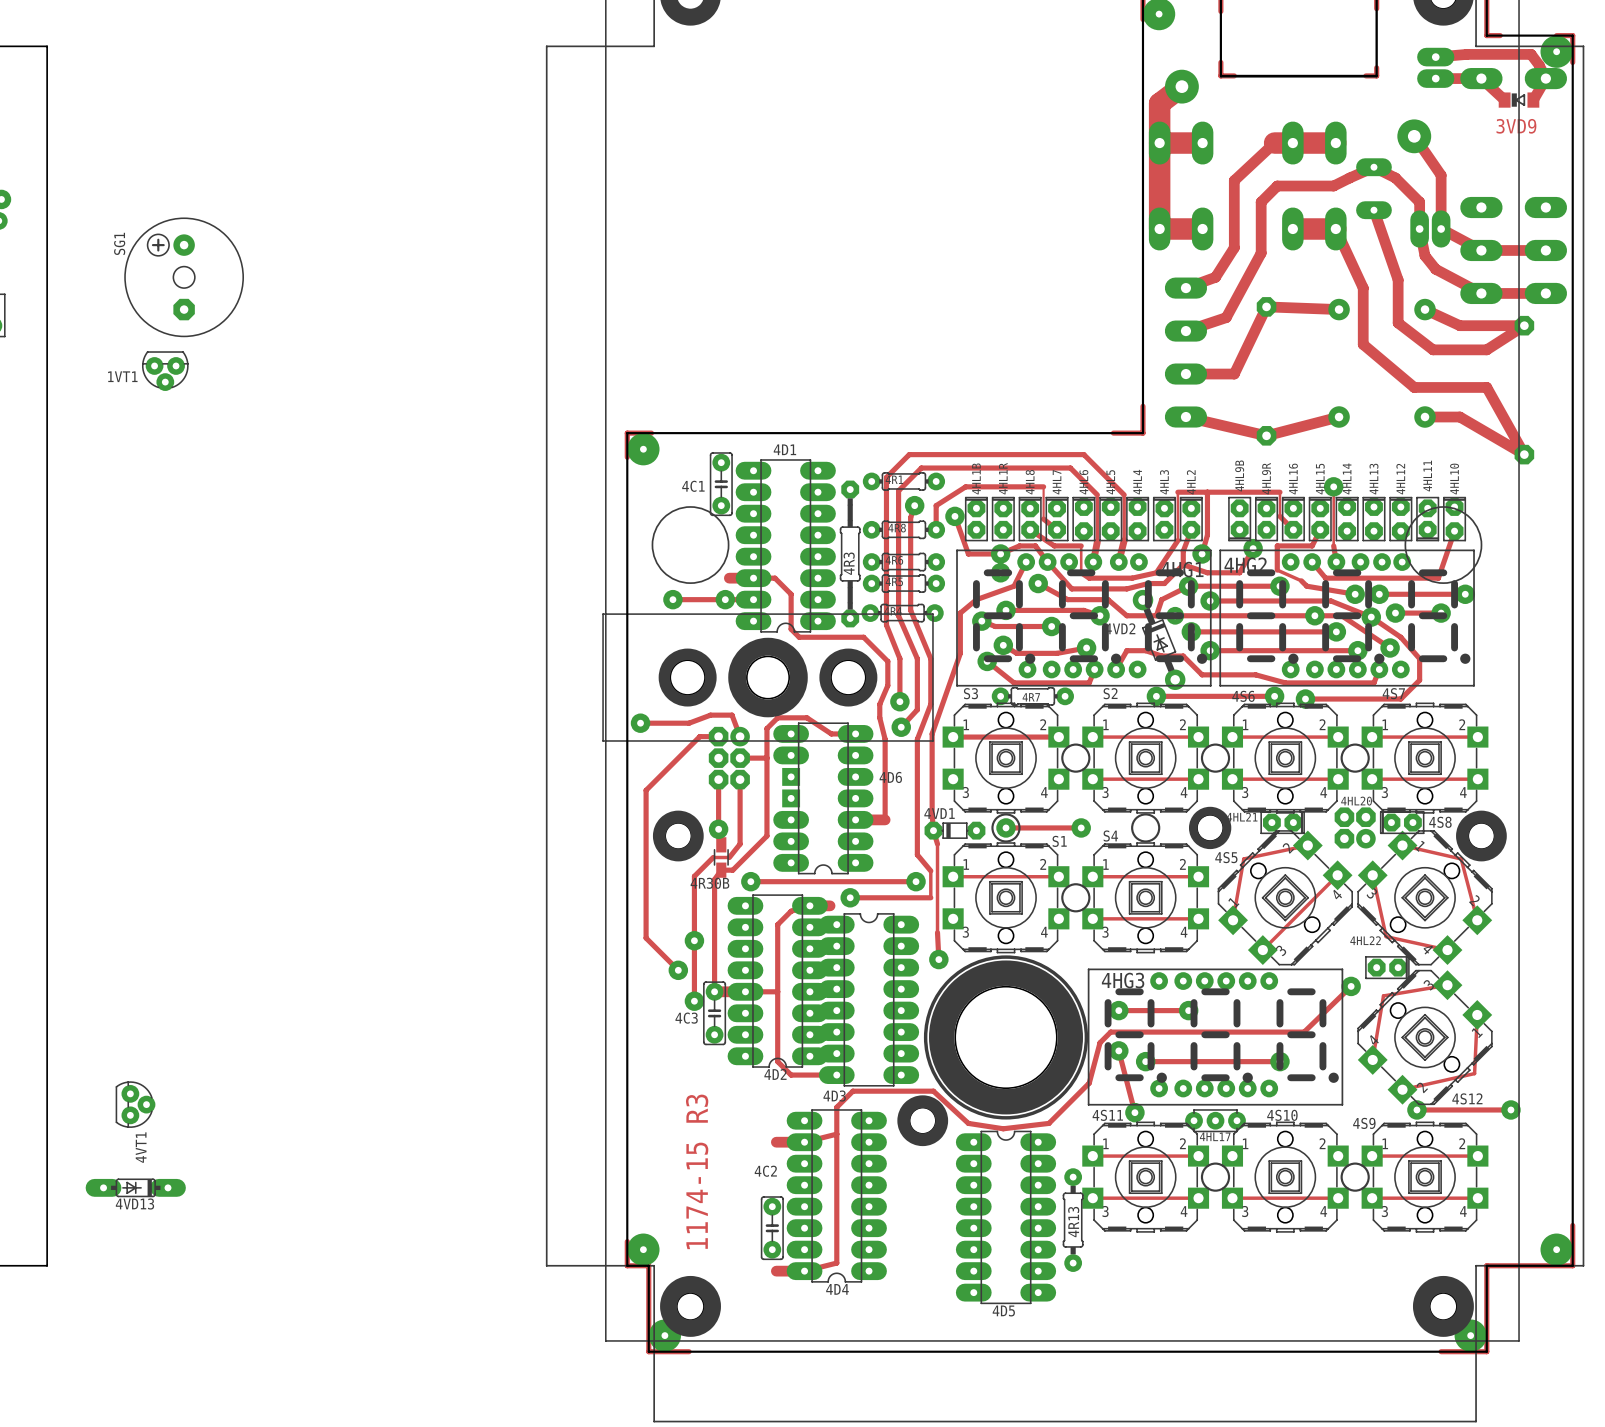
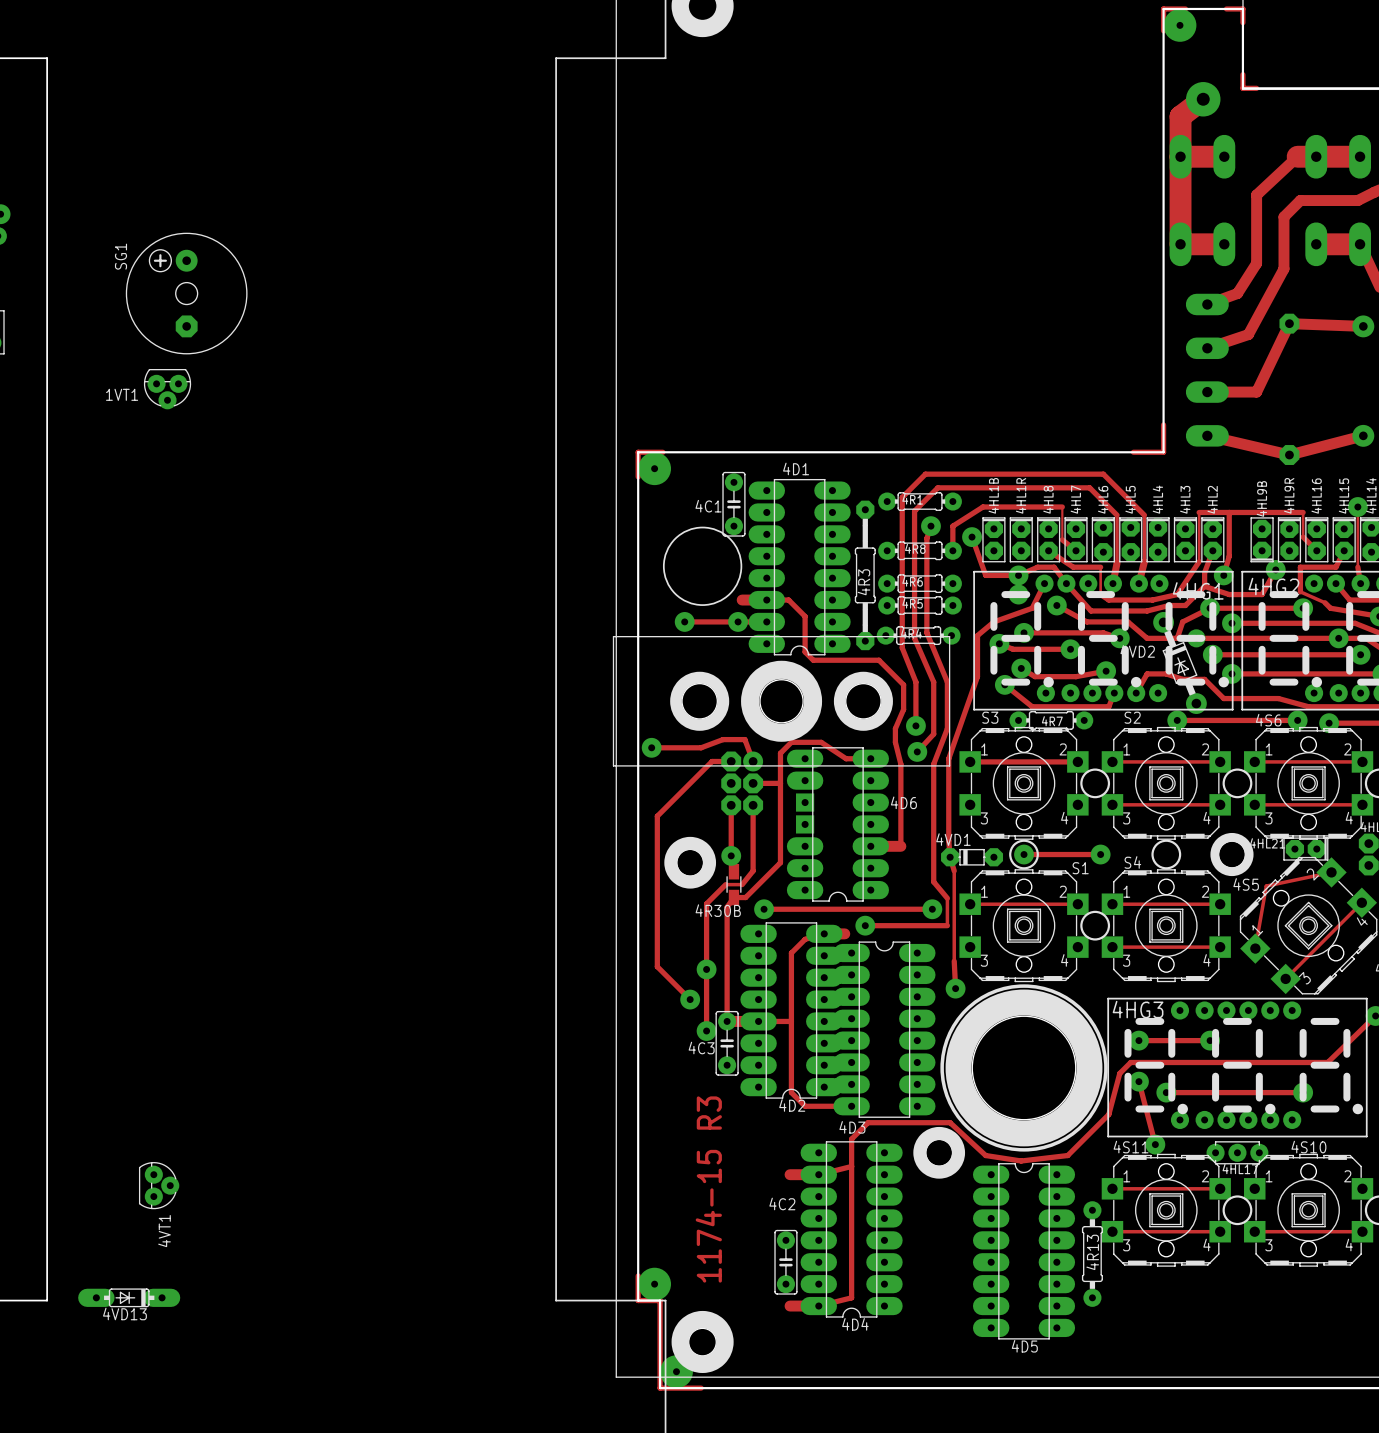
4VT1 footprint: [115, 1081, 156, 1128] -> [139, 1162, 180, 1210]
4VD13 position: (135, 1187) -> (129, 1297)

